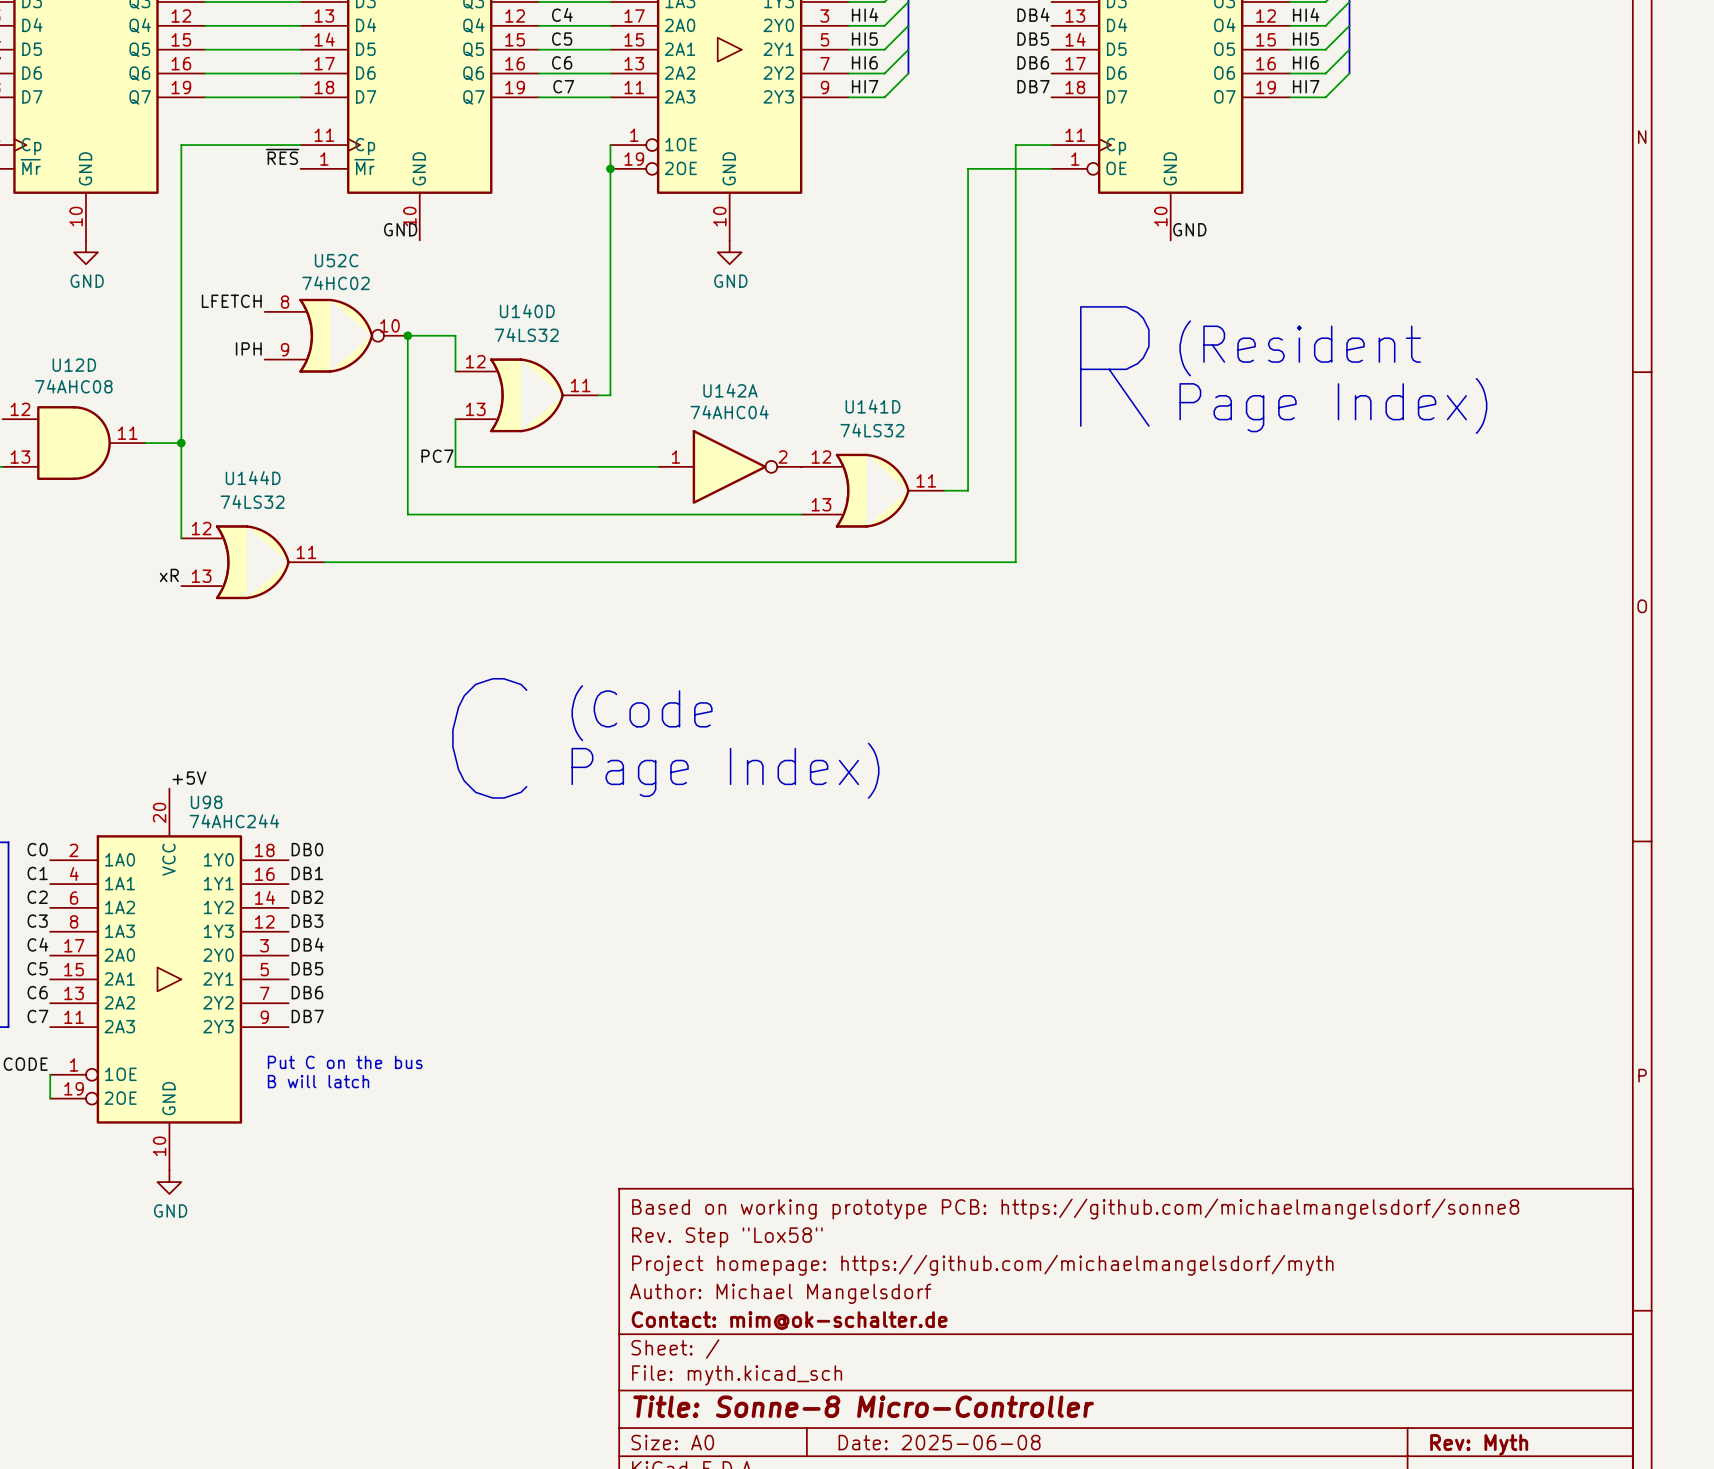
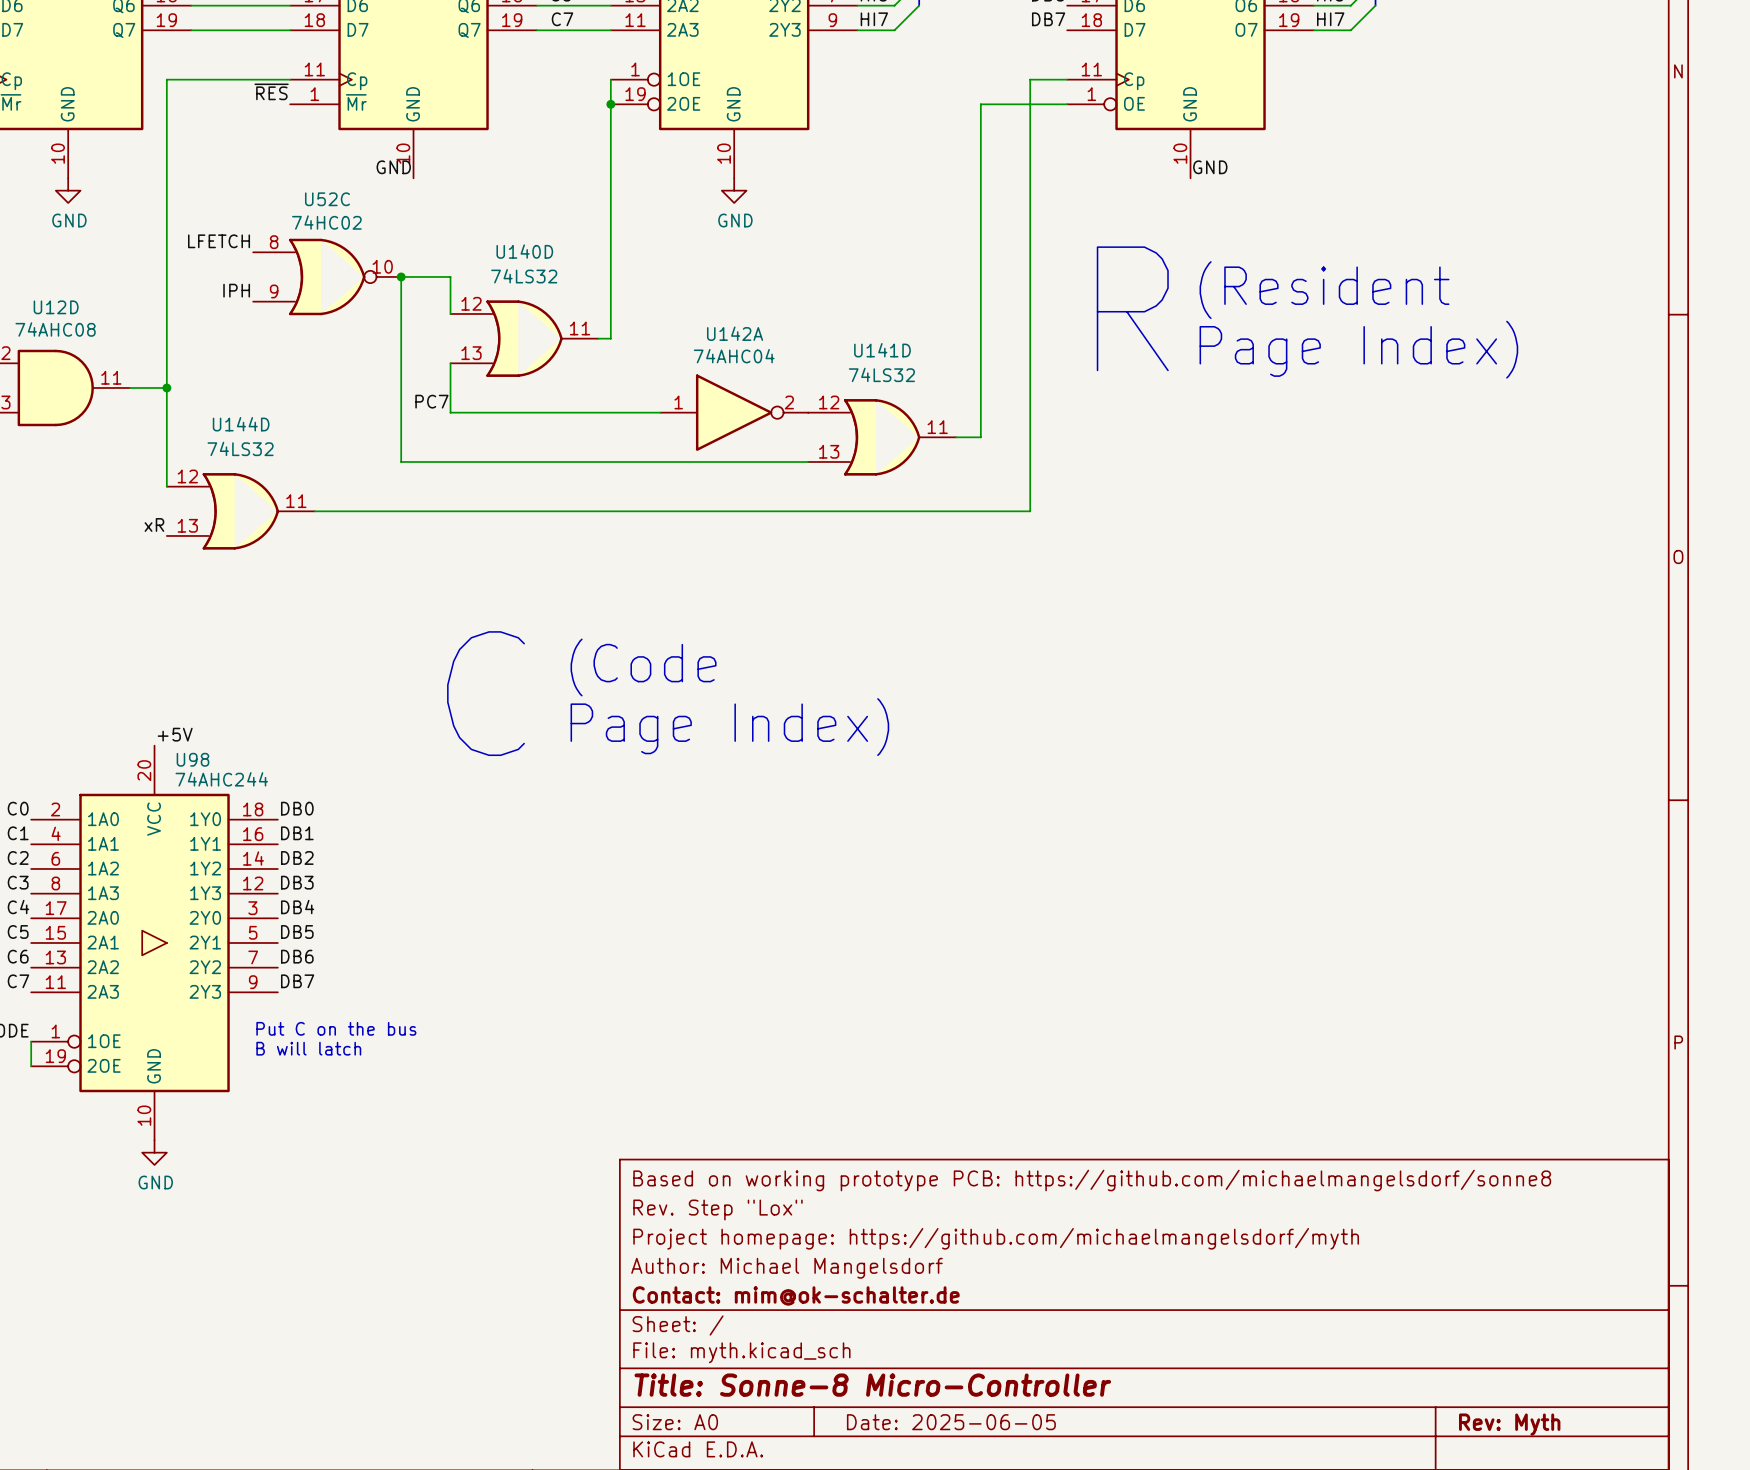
title block: Rev. Step "Lox58" (727, 1237) -> Rev. Step "Lox" (717, 1209)
title block: Date: 2025-06-08 (939, 1442) -> Date: 2025-06-05 (951, 1422)

